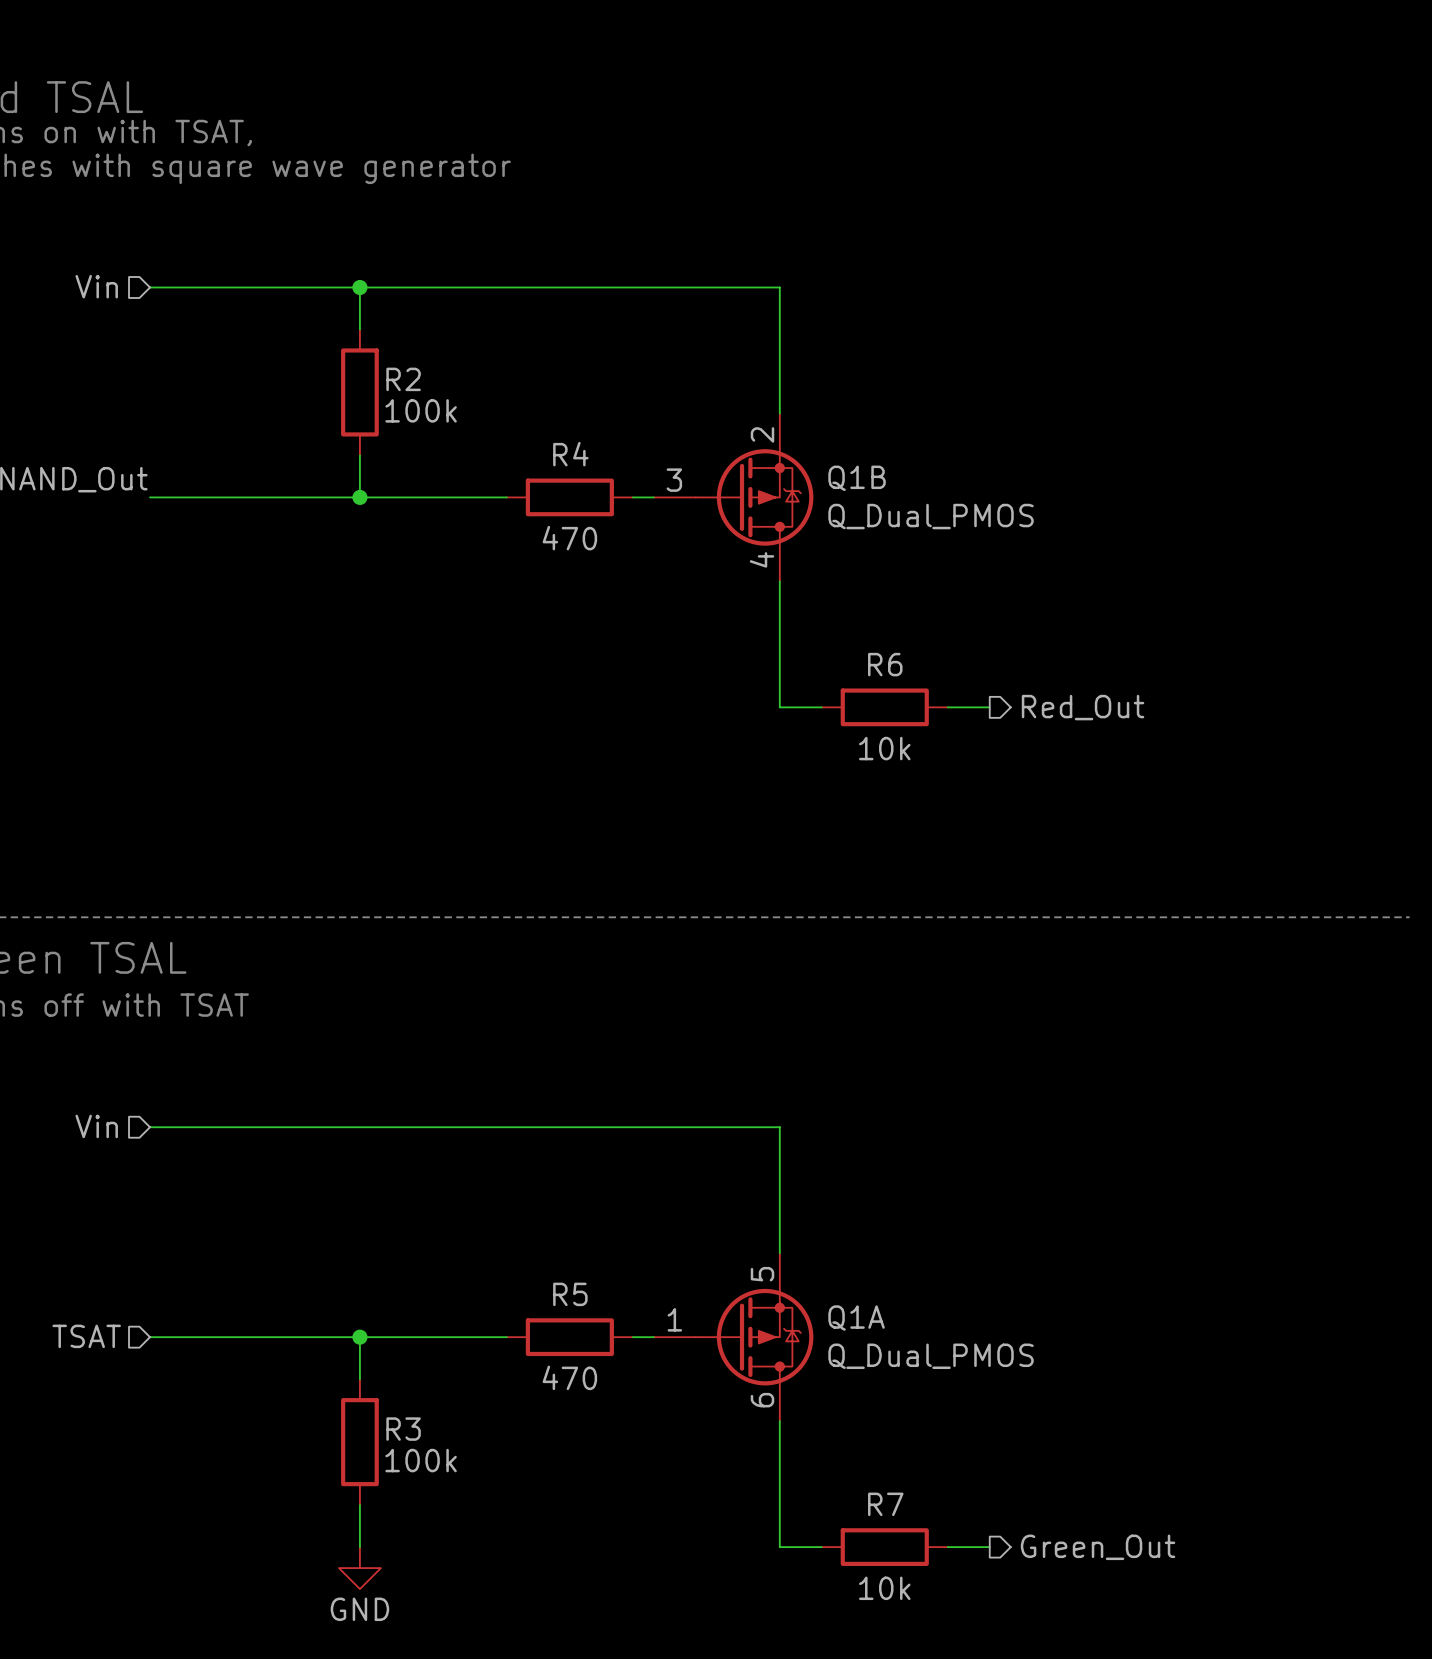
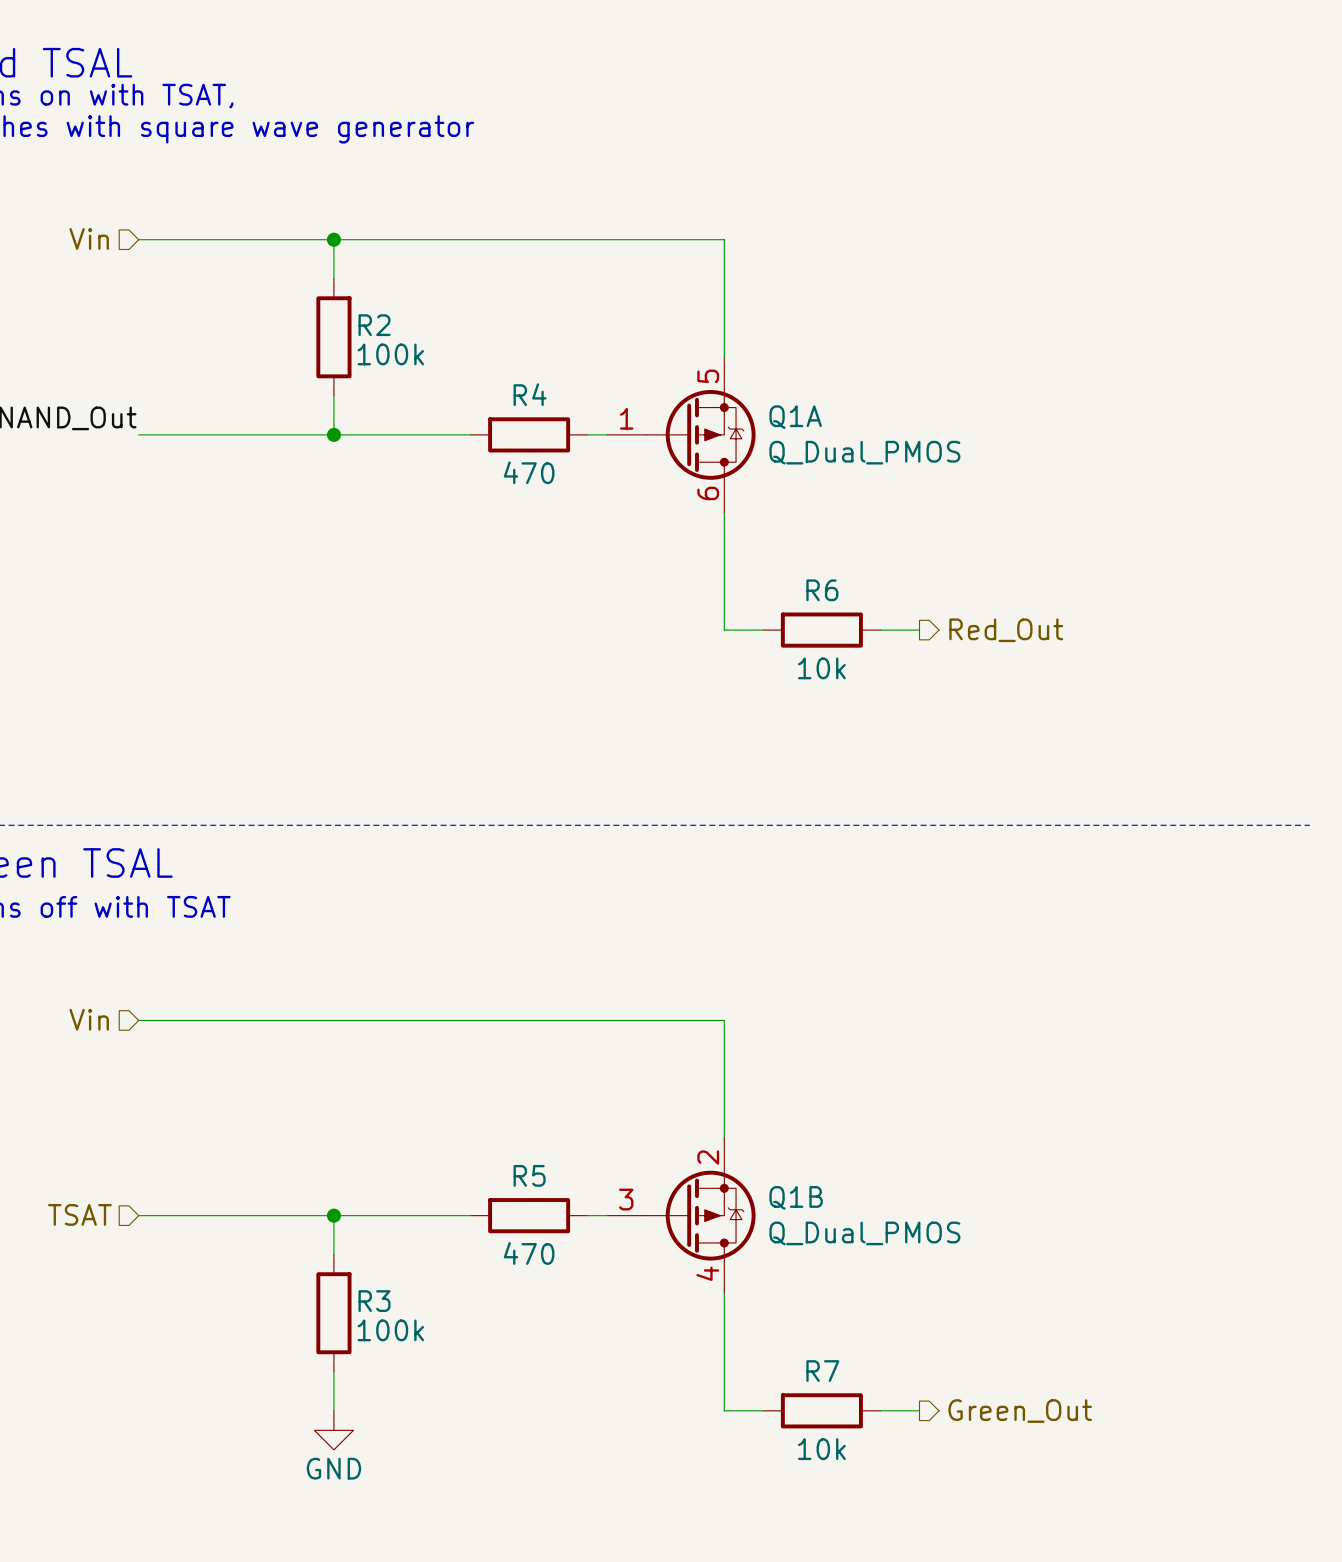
Q1B position: (733, 497) -> (681, 1215)
Q1A position: (733, 1337) -> (681, 434)

